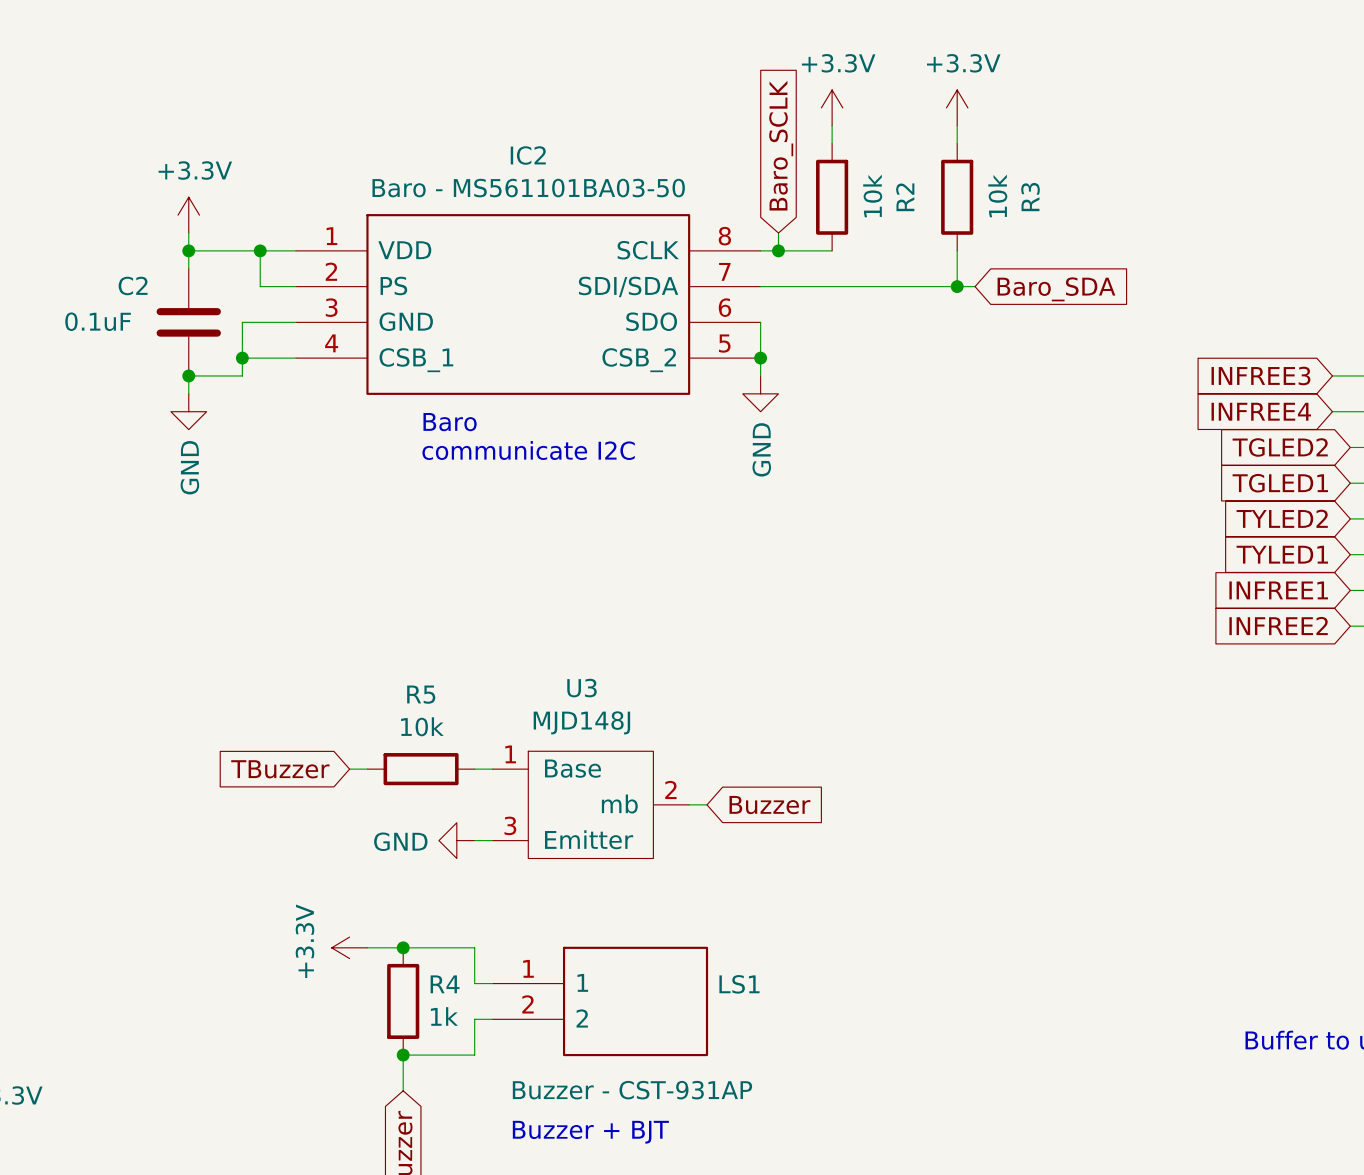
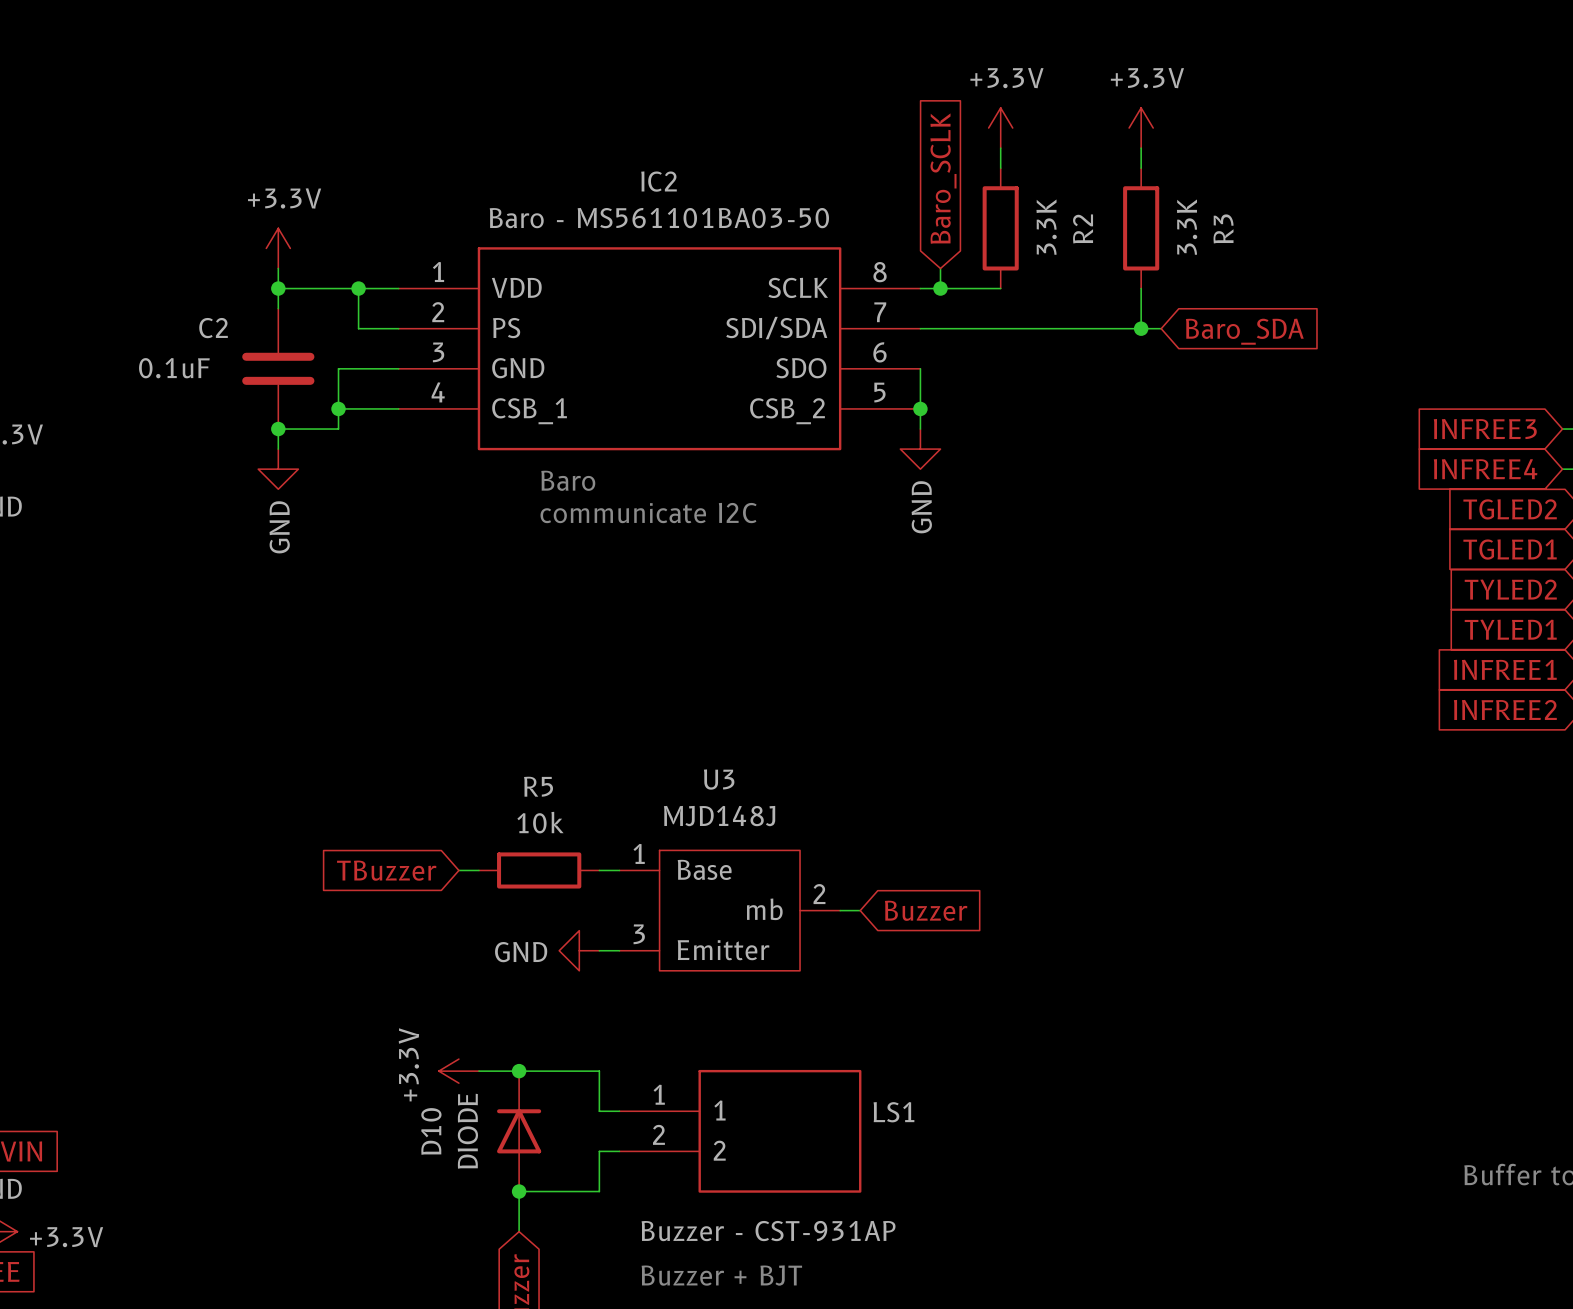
R2 value: 10k (872, 195) -> 3.3K (1046, 227)
R3 value: 10k (997, 195) -> 3.3K (1187, 227)
R4: 1k (403, 1001) -> none
D10: none -> DIODE (519, 1131)

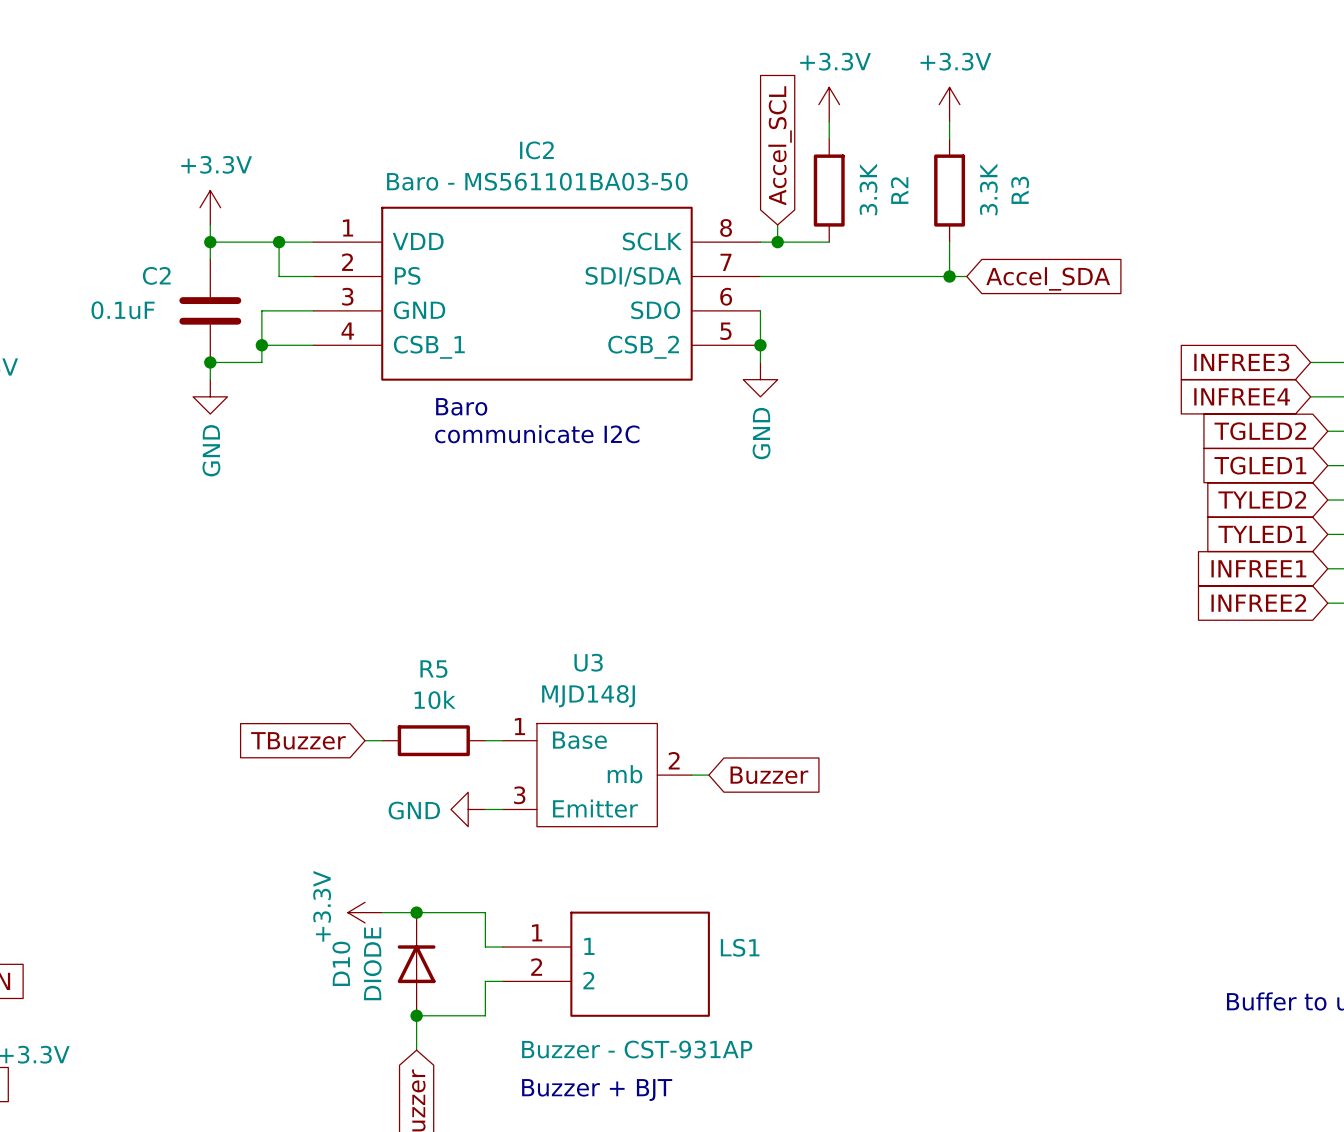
global label: Baro_SCLK (943, 178) -> Accel_SCL (780, 145)
global label: Baro_SDA (1244, 331) -> Accel_SDA (1048, 278)

